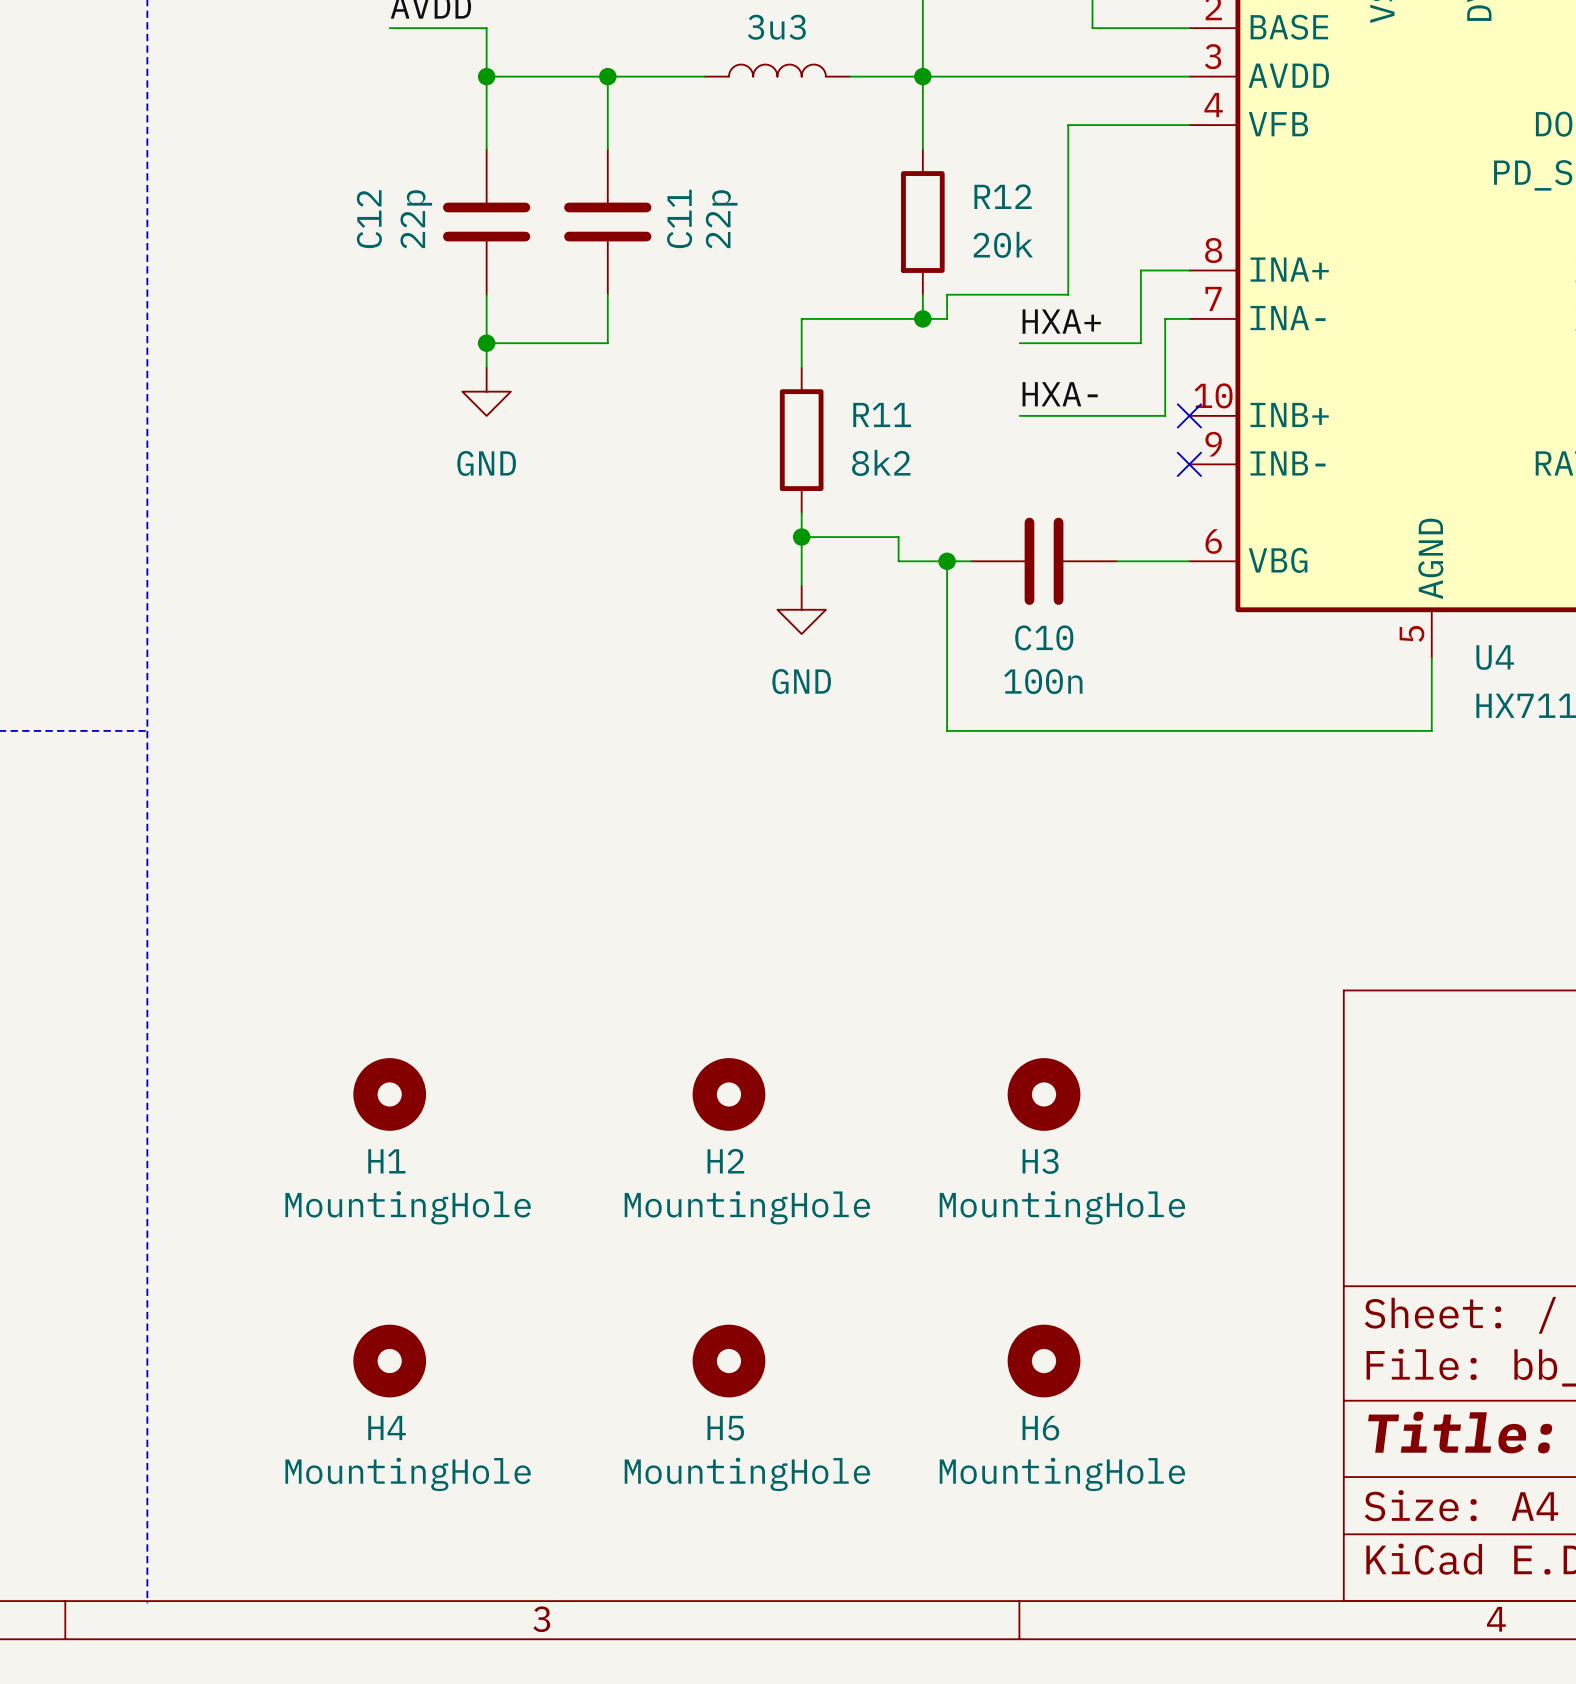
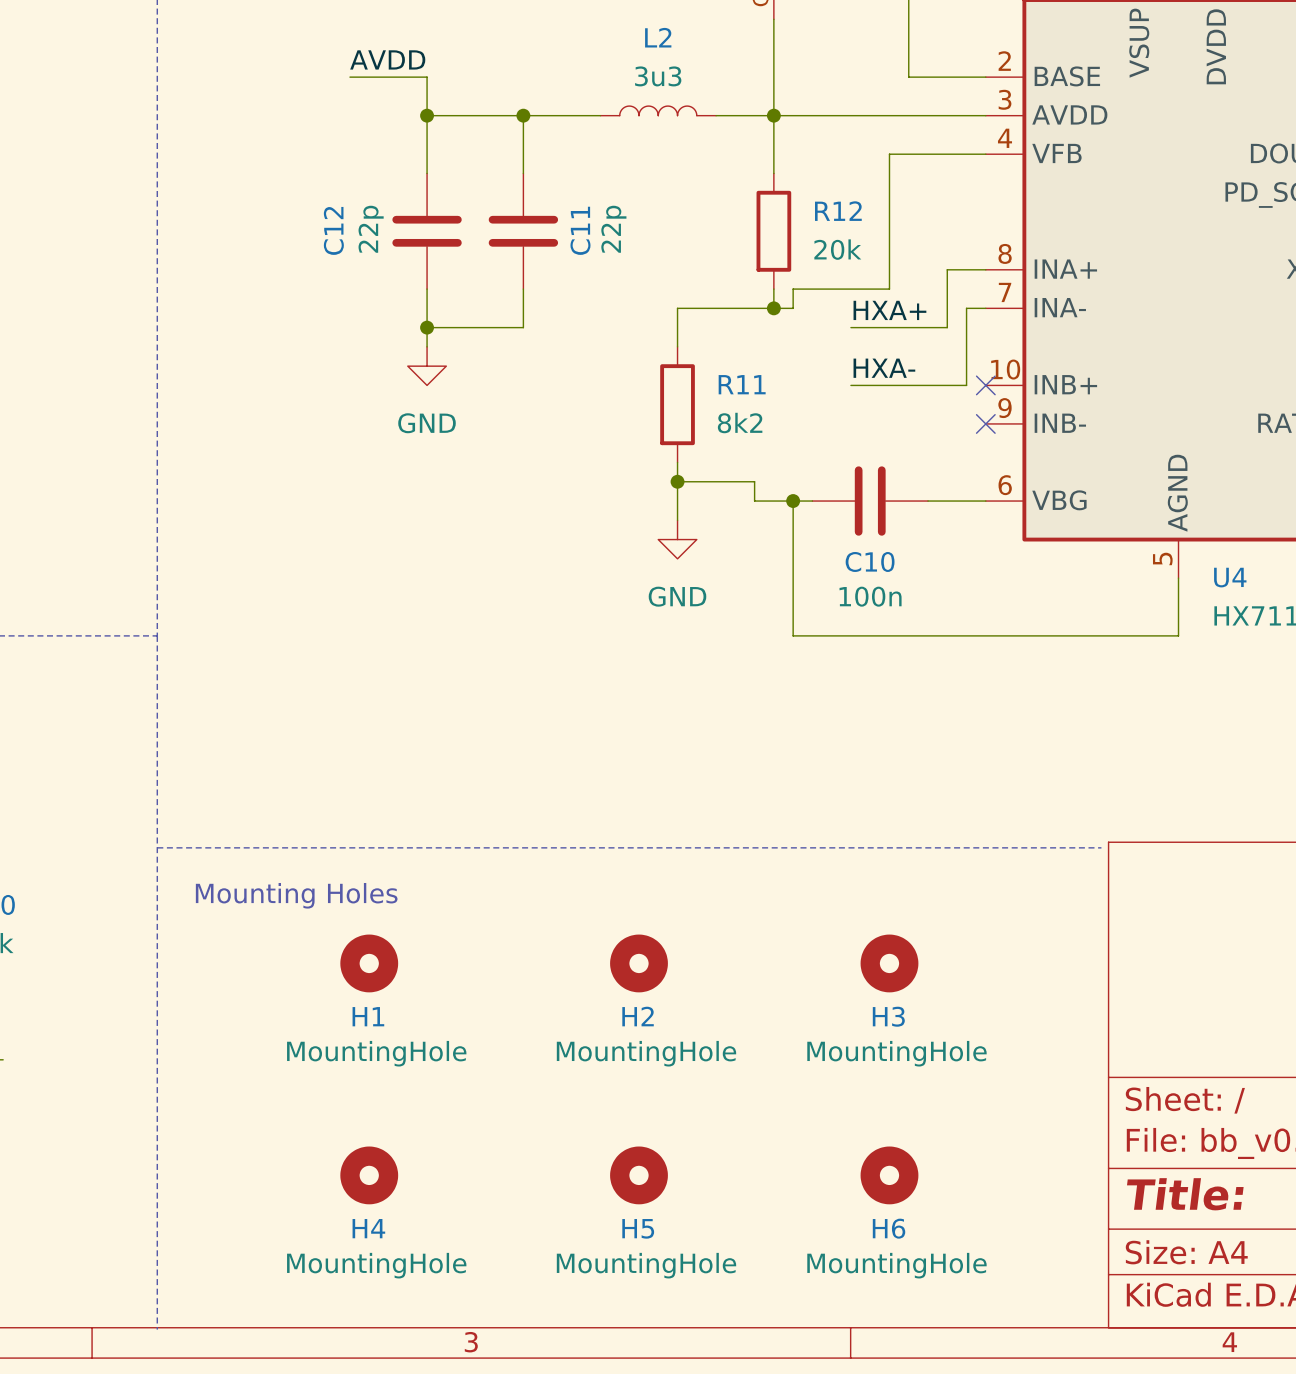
line: none -> (157, 847) (1101, 847)
text: none -> Mounting Holes (296, 895)
H1 position: (389, 1094) -> (369, 963)
H2 position: (728, 1094) -> (639, 963)
H3 position: (1044, 1094) -> (889, 963)
H4 position: (389, 1361) -> (369, 1175)
H5 position: (728, 1361) -> (639, 1175)
H6 position: (1044, 1361) -> (889, 1175)

